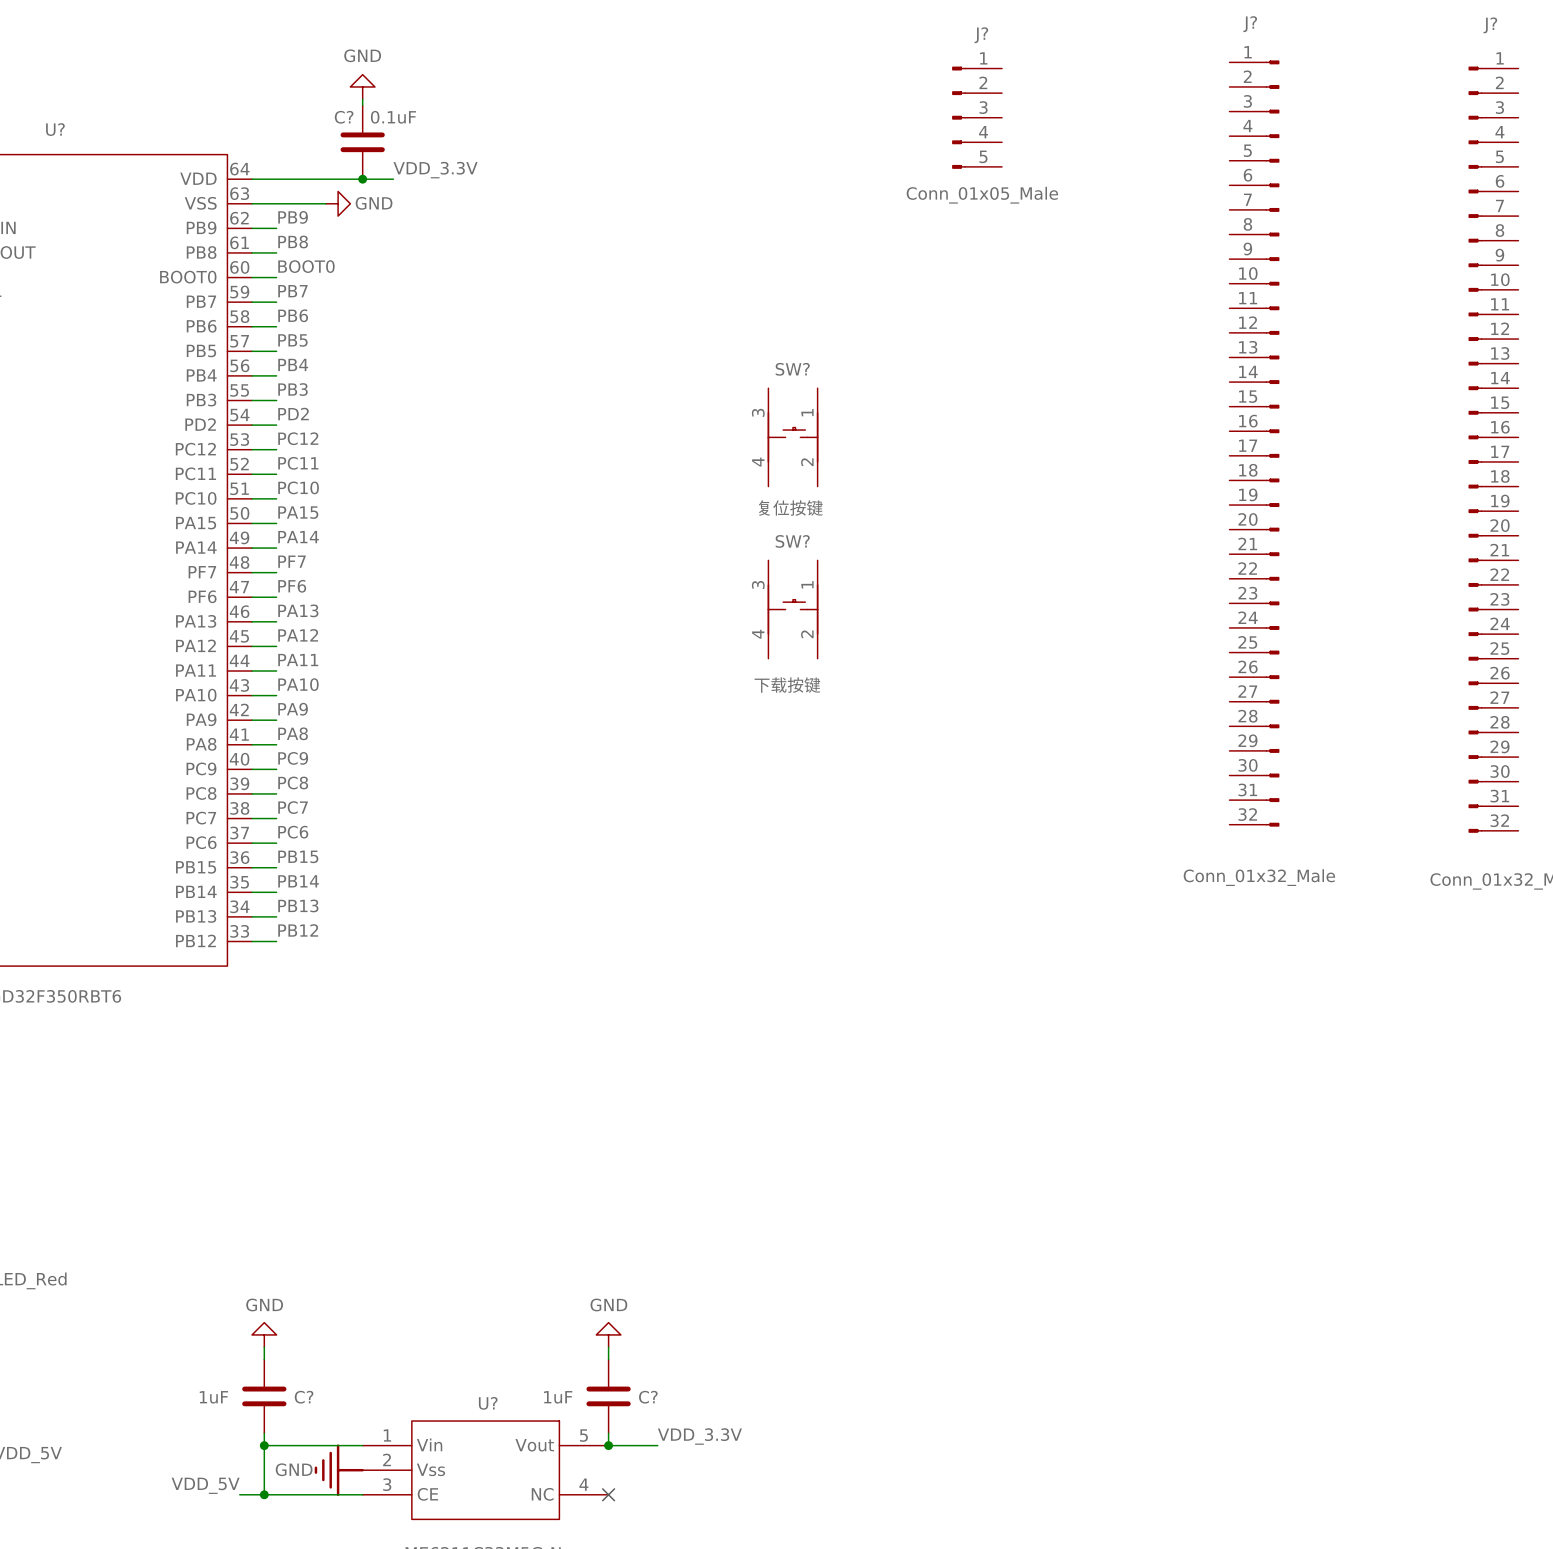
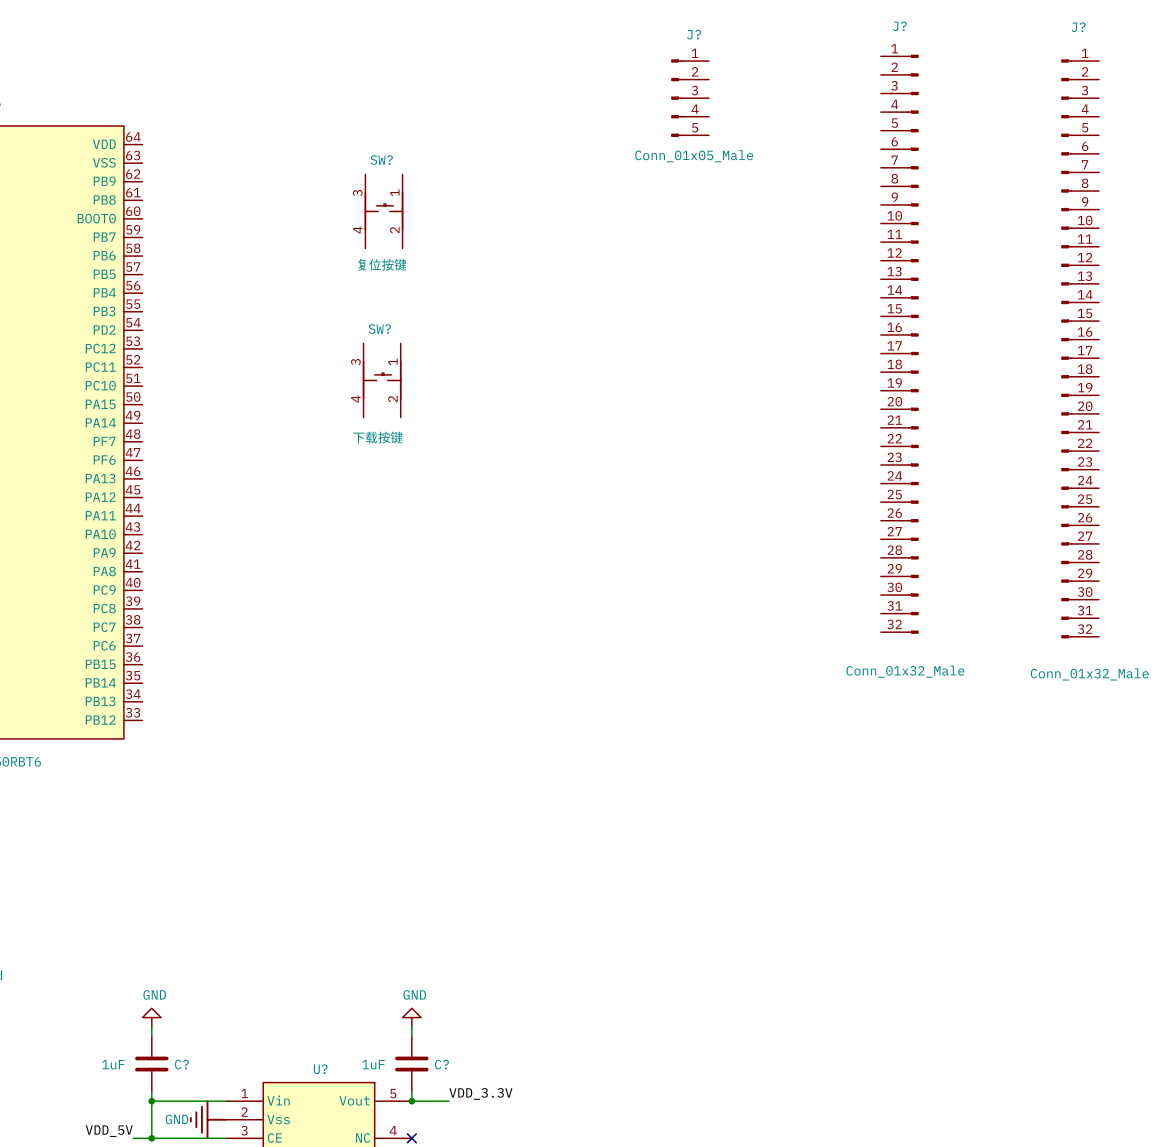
power symbol: GND (362, 86) -> none
wire: (362, 99) (362, 105) -> none
C?: 0.1uF (362, 142) -> none
label: VDD_3.3V (435, 170) -> none
wire: (252, 179) (393, 179) -> none
junction: (362, 179) -> none
wire: (252, 203) (325, 203) -> none
power symbol: GND (338, 203) -> none
label: PB9 (293, 217) -> none
wire: (252, 228) (276, 228) -> none
label: PB8 (293, 242) -> none
wire: (252, 252) (276, 252) -> none
label: BOOT0 (306, 266) -> none
SW?: none -> 复位按键 (383, 211)
wire: (252, 277) (276, 277) -> none
label: PB7 (292, 291) -> none
wire: (252, 302) (276, 302) -> none
label: PB6 (293, 315) -> none
wire: (252, 326) (276, 326) -> none
label: PB5 (292, 340) -> none
wire: (252, 351) (276, 351) -> none
label: PB4 (293, 364) -> none
wire: (252, 375) (276, 375) -> none
label: PB3 (292, 389) -> none
wire: (252, 400) (276, 400) -> none
label: PD2 (293, 414) -> none
wire: (252, 425) (276, 425) -> none
SW?: 复位按键 (793, 437) -> none
label: PC12 (298, 438) -> none
wire: (252, 449) (276, 449) -> none
label: PC11 (298, 463) -> none
wire: (252, 474) (276, 474) -> none
label: PC10 (298, 487) -> none
SW?: none -> 下载按键 (382, 380)
wire: (252, 498) (276, 498) -> none
label: PA15 (298, 512) -> none
wire: (252, 523) (276, 523) -> none
label: PA14 (298, 537) -> none
wire: (252, 548) (276, 548) -> none
label: PF7 (292, 561) -> none
wire: (252, 572) (276, 572) -> none
label: PF6 (292, 586) -> none
wire: (252, 597) (276, 597) -> none
SW?: 下载按键 (793, 609) -> none
label: PA13 (298, 610) -> none
wire: (252, 621) (276, 621) -> none
label: PA12 (298, 635) -> none
wire: (252, 646) (276, 646) -> none
label: PA11 (298, 660) -> none
wire: (252, 671) (276, 671) -> none
label: PA10 (298, 684) -> none
wire: (252, 695) (276, 695) -> none
label: PA9 (293, 709) -> none
wire: (252, 720) (276, 720) -> none
label: PA8 (293, 733) -> none
wire: (252, 744) (276, 744) -> none
label: PC9 (293, 758) -> none
wire: (252, 769) (276, 769) -> none
label: PC8 (293, 782) -> none
wire: (252, 793) (276, 793) -> none
label: PC7 (293, 807) -> none
wire: (252, 818) (276, 818) -> none
label: PC6 (293, 832) -> none
wire: (252, 843) (276, 843) -> none
label: PB15 (298, 856) -> none
wire: (252, 867) (276, 867) -> none
label: PB14 (298, 881) -> none
wire: (252, 892) (276, 892) -> none
label: PB13 (298, 905) -> none
wire: (252, 916) (276, 916) -> none
label: PB12 (298, 930) -> none
wire: (252, 941) (276, 941) -> none

